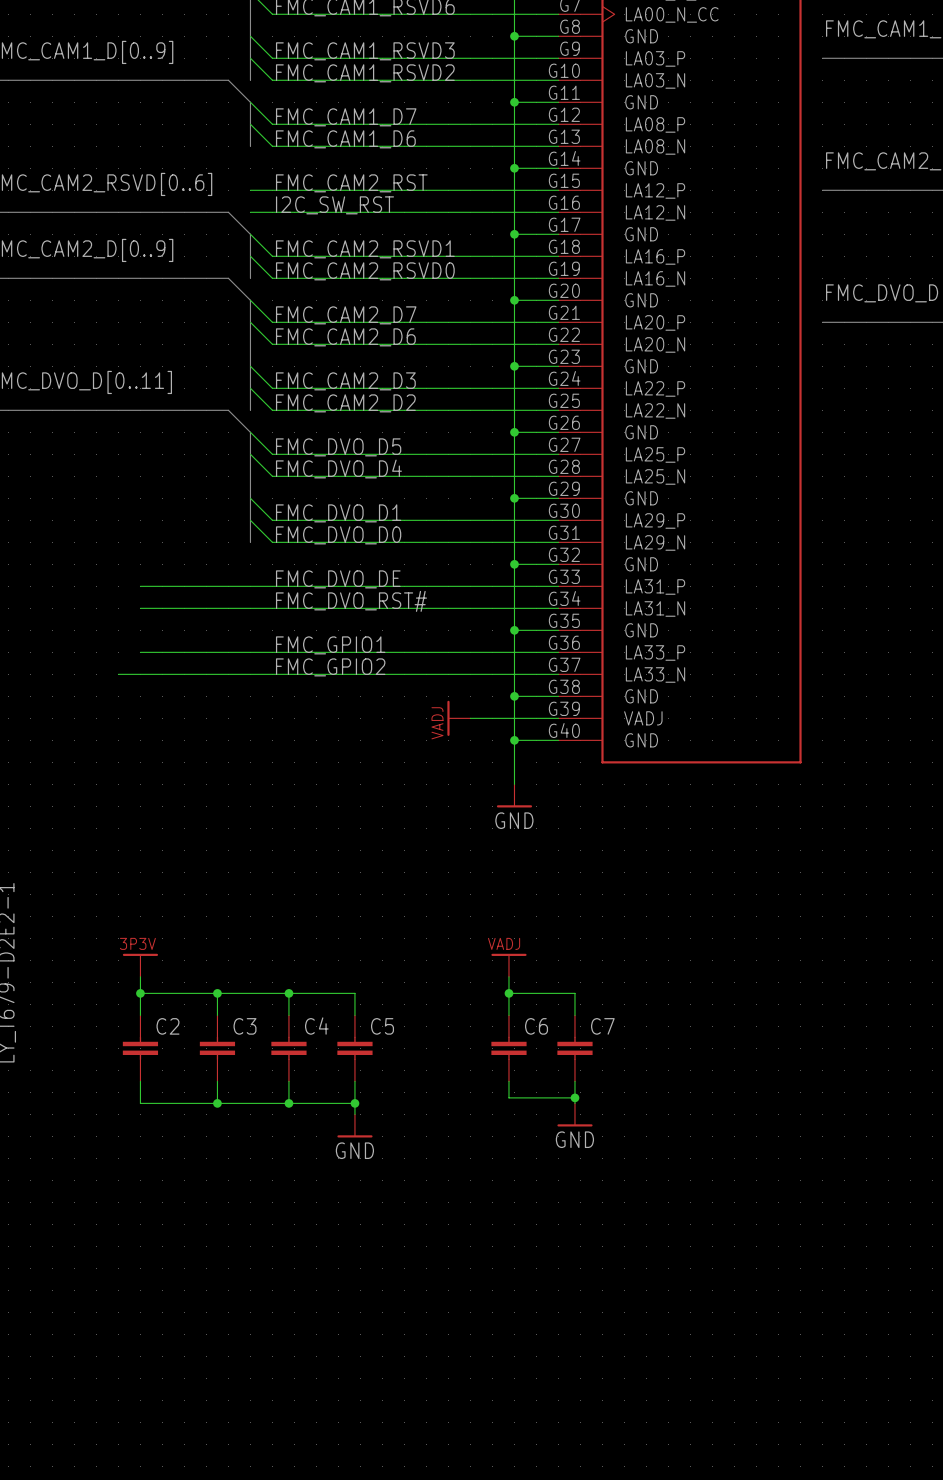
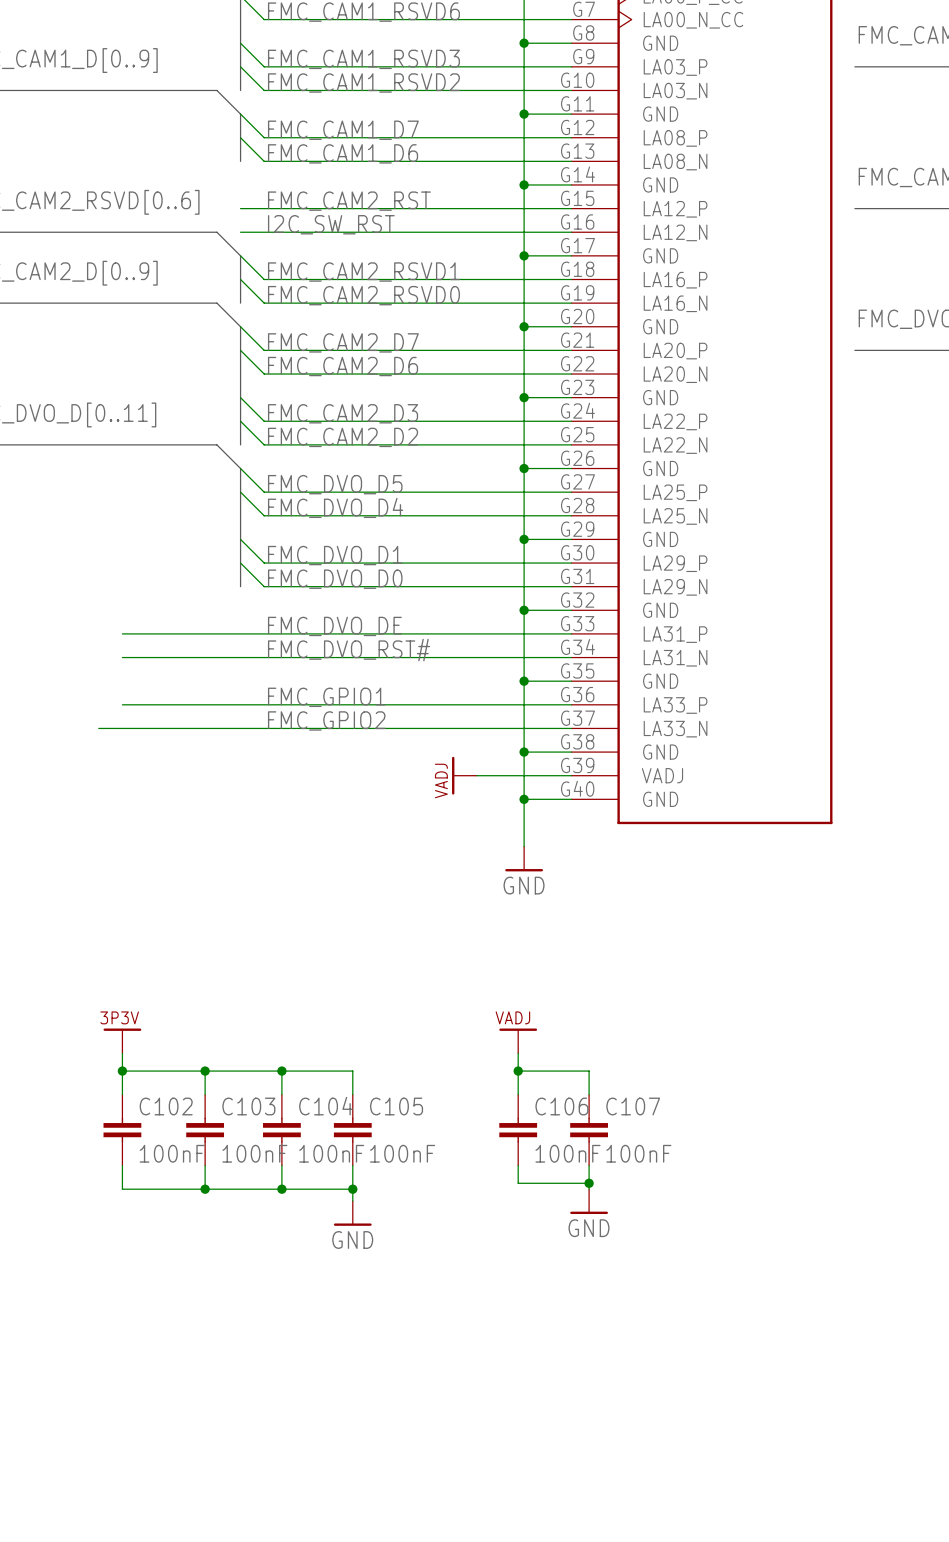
C2 name: C2 (167, 1026) -> C102 (166, 1106)
C3 name: C3 (244, 1026) -> C103 (248, 1106)
C4 name: C4 (316, 1026) -> C104 (326, 1106)
C5 name: C5 (382, 1026) -> C105 (396, 1106)
C6 name: C6 (536, 1026) -> C106 (561, 1106)
C7 name: C7 (602, 1026) -> C107 (633, 1106)
C2 value: none -> 100nF (172, 1153)
C3 value: none -> 100nF (254, 1153)
C4 value: none -> 100nF (331, 1153)
C5 value: none -> 100nF (402, 1153)
C6 value: none -> 100nF (567, 1153)
C7 value: none -> 100nF (638, 1153)

